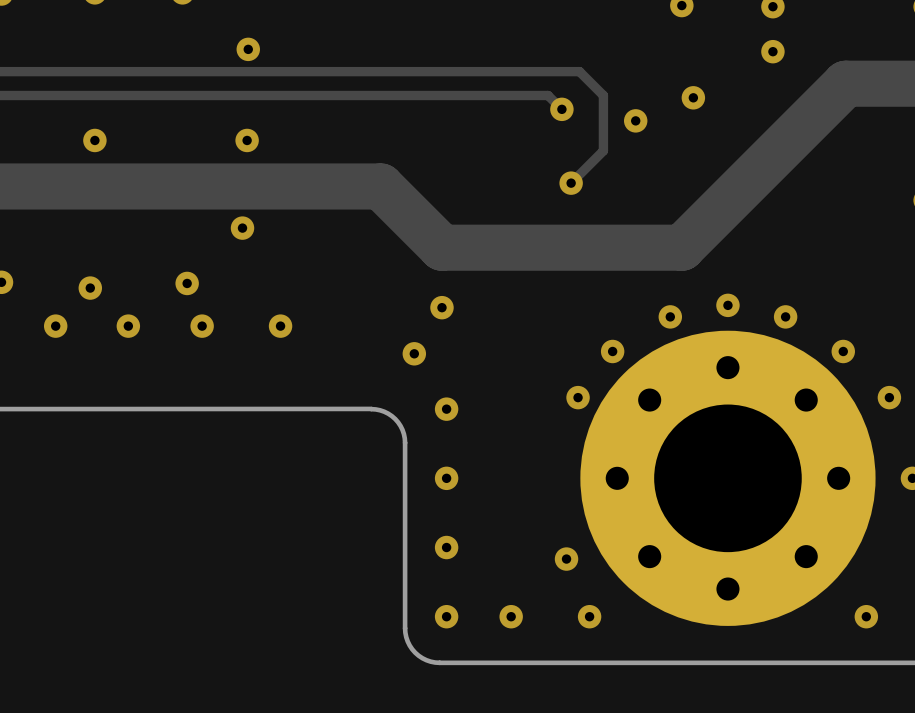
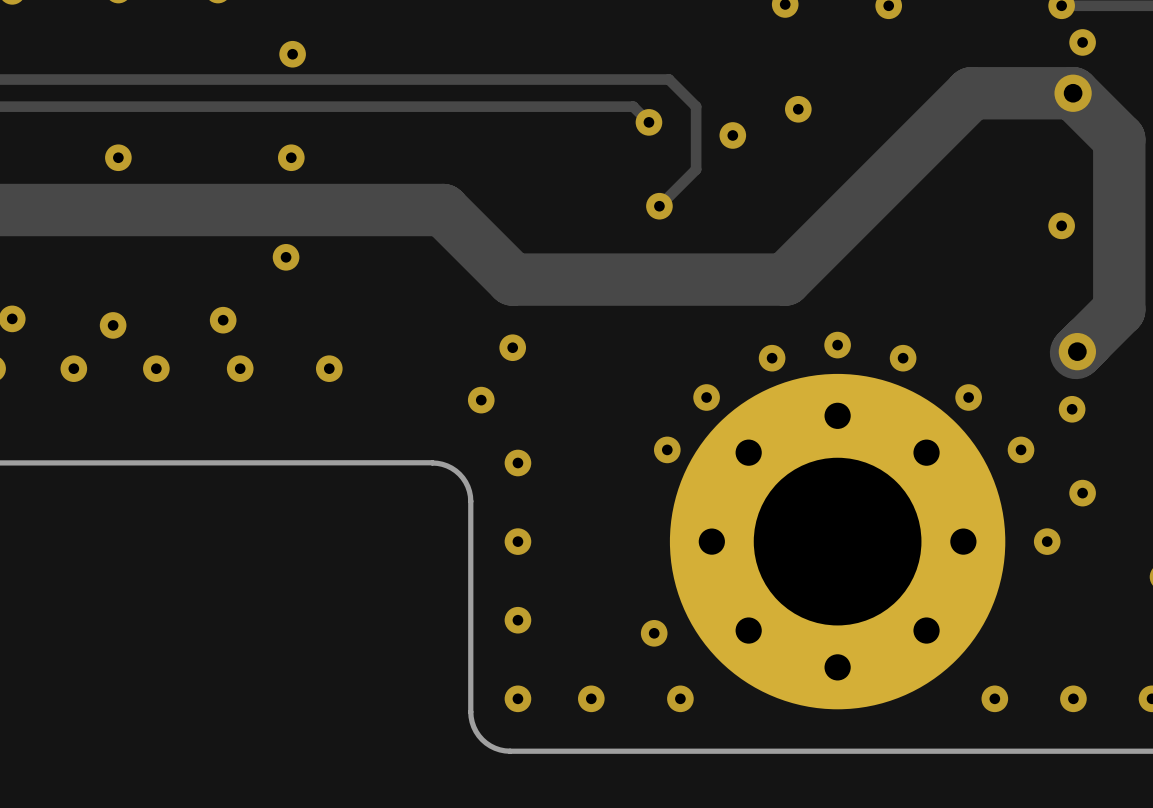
via: (772, 51) -> none

